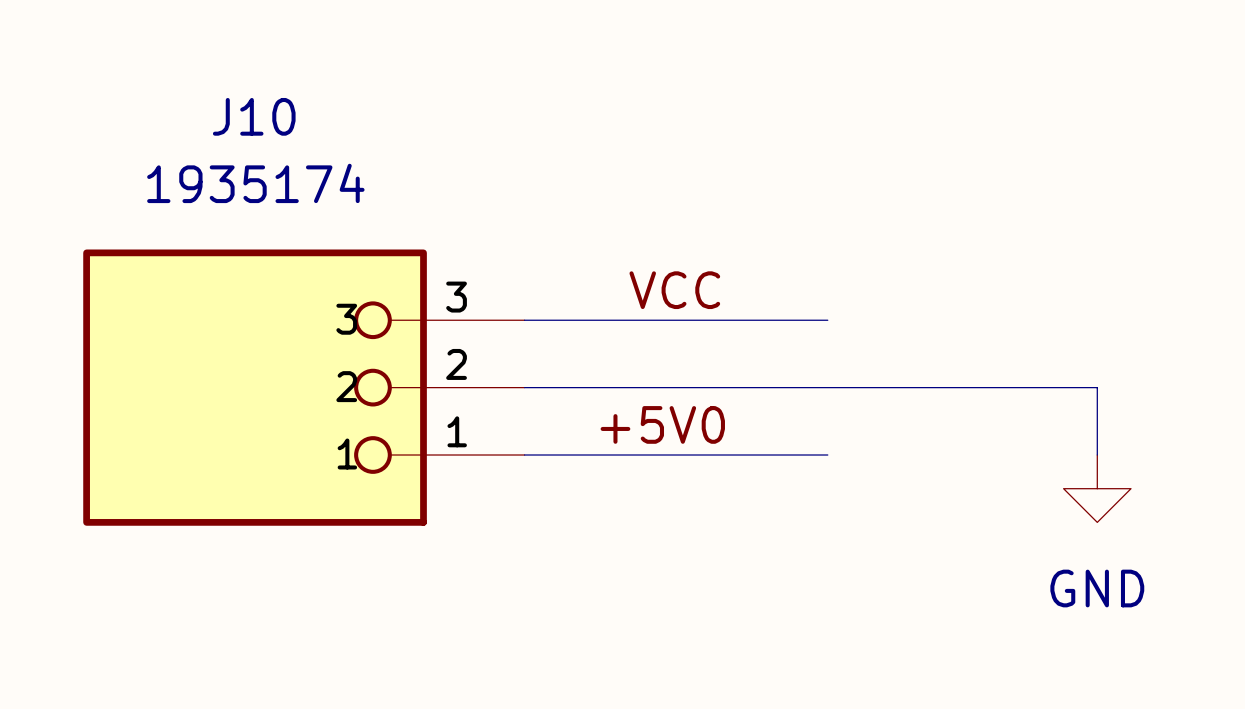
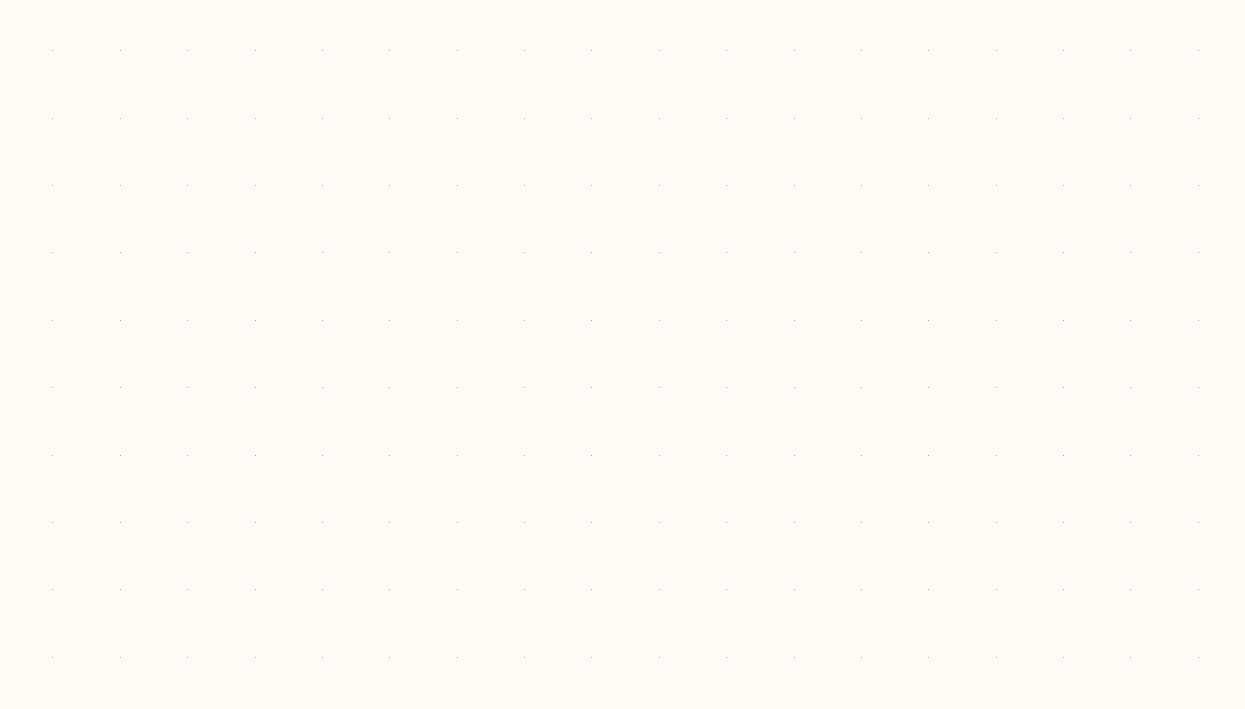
label: VCC (674, 290) -> none
wire: (524, 320) (827, 320) -> none
J10: 1935174 (303, 387) -> none
wire: (524, 387) (1097, 387) (1097, 455) -> none
label: +5V0 (662, 424) -> none
wire: (524, 455) (827, 455) -> none
power symbol: GND (1097, 488) -> none

